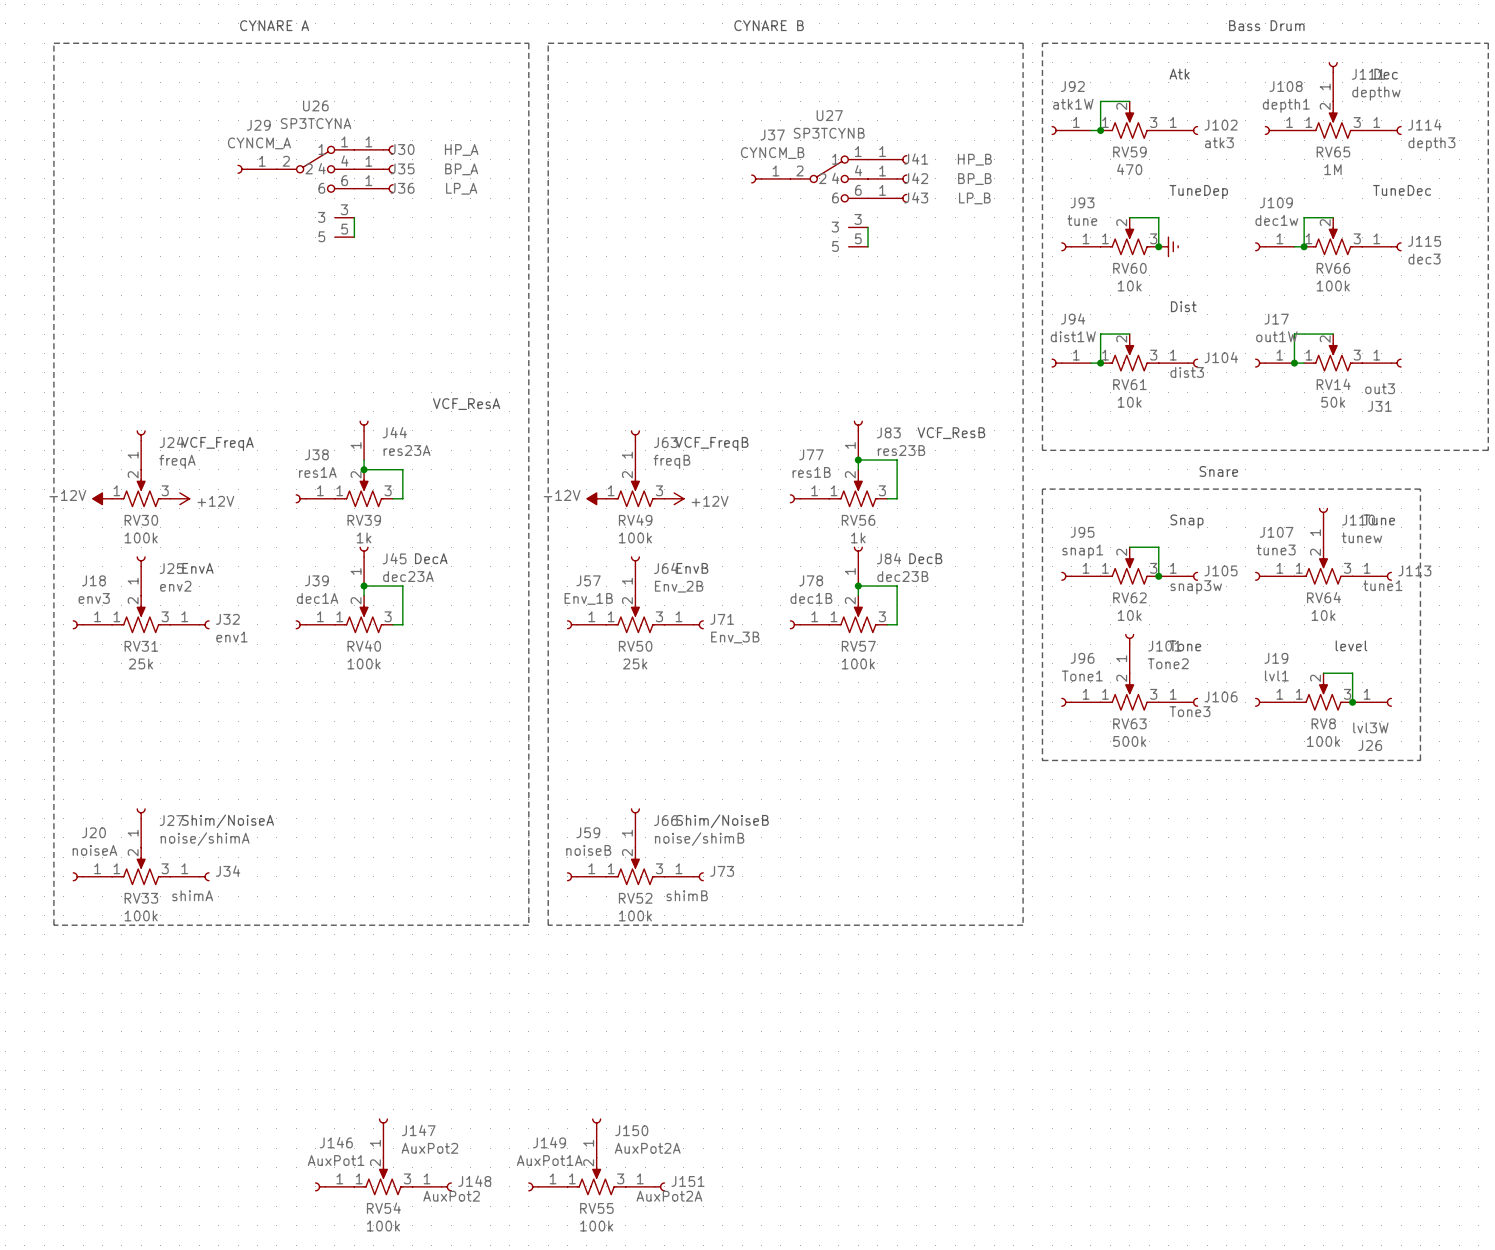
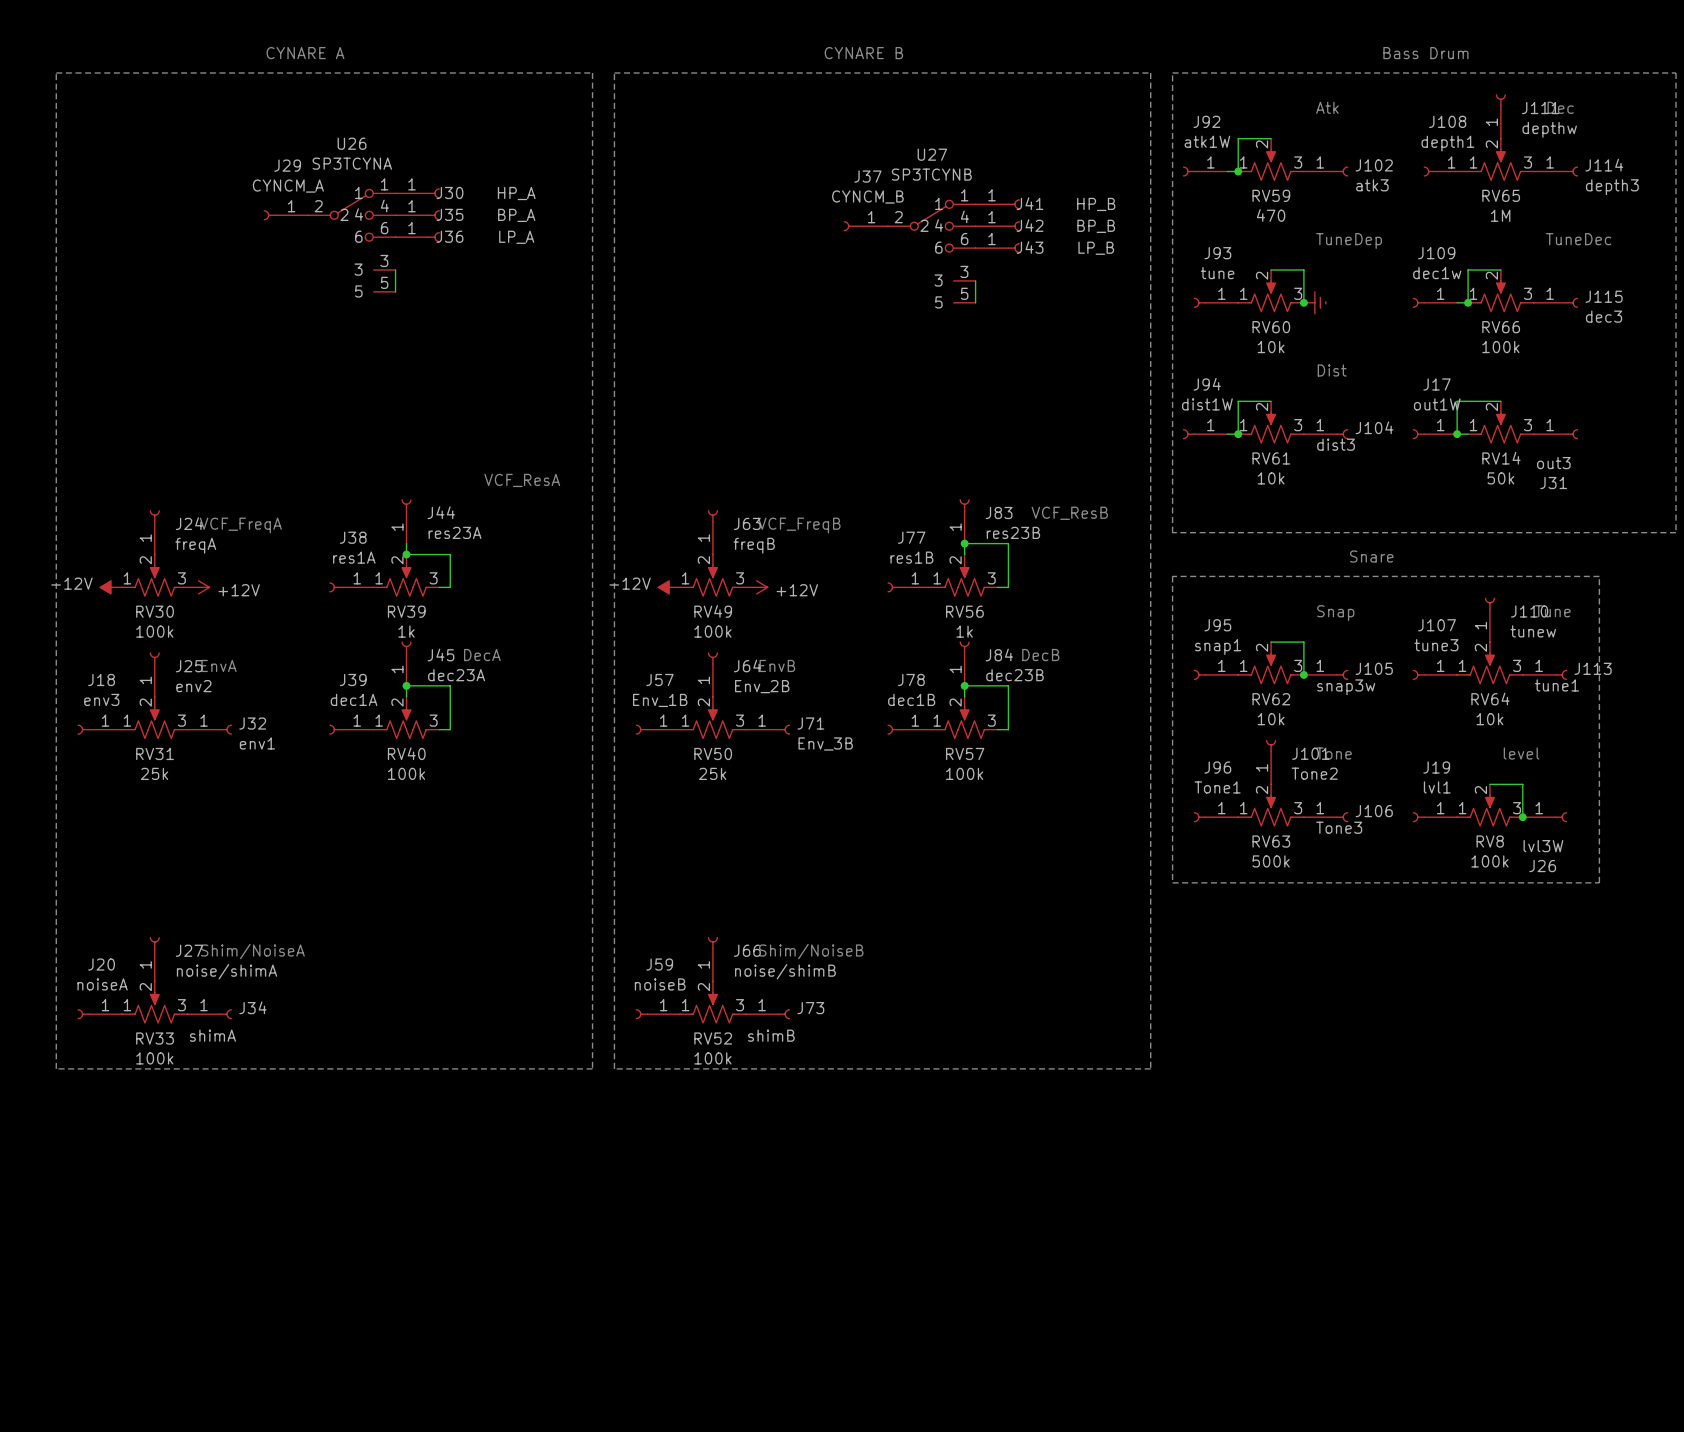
J147: AuxPot2 (383, 1138) -> none
J150: AuxPot2A (596, 1138) -> none
RV54: 100k (383, 1176) -> none
RV55: 100k (596, 1176) -> none
J146: AuxPot1 (334, 1186) -> none
J148: AuxPot2 (432, 1186) -> none
J149: AuxPot1A (547, 1186) -> none
J151: AuxPot2A (645, 1186) -> none

